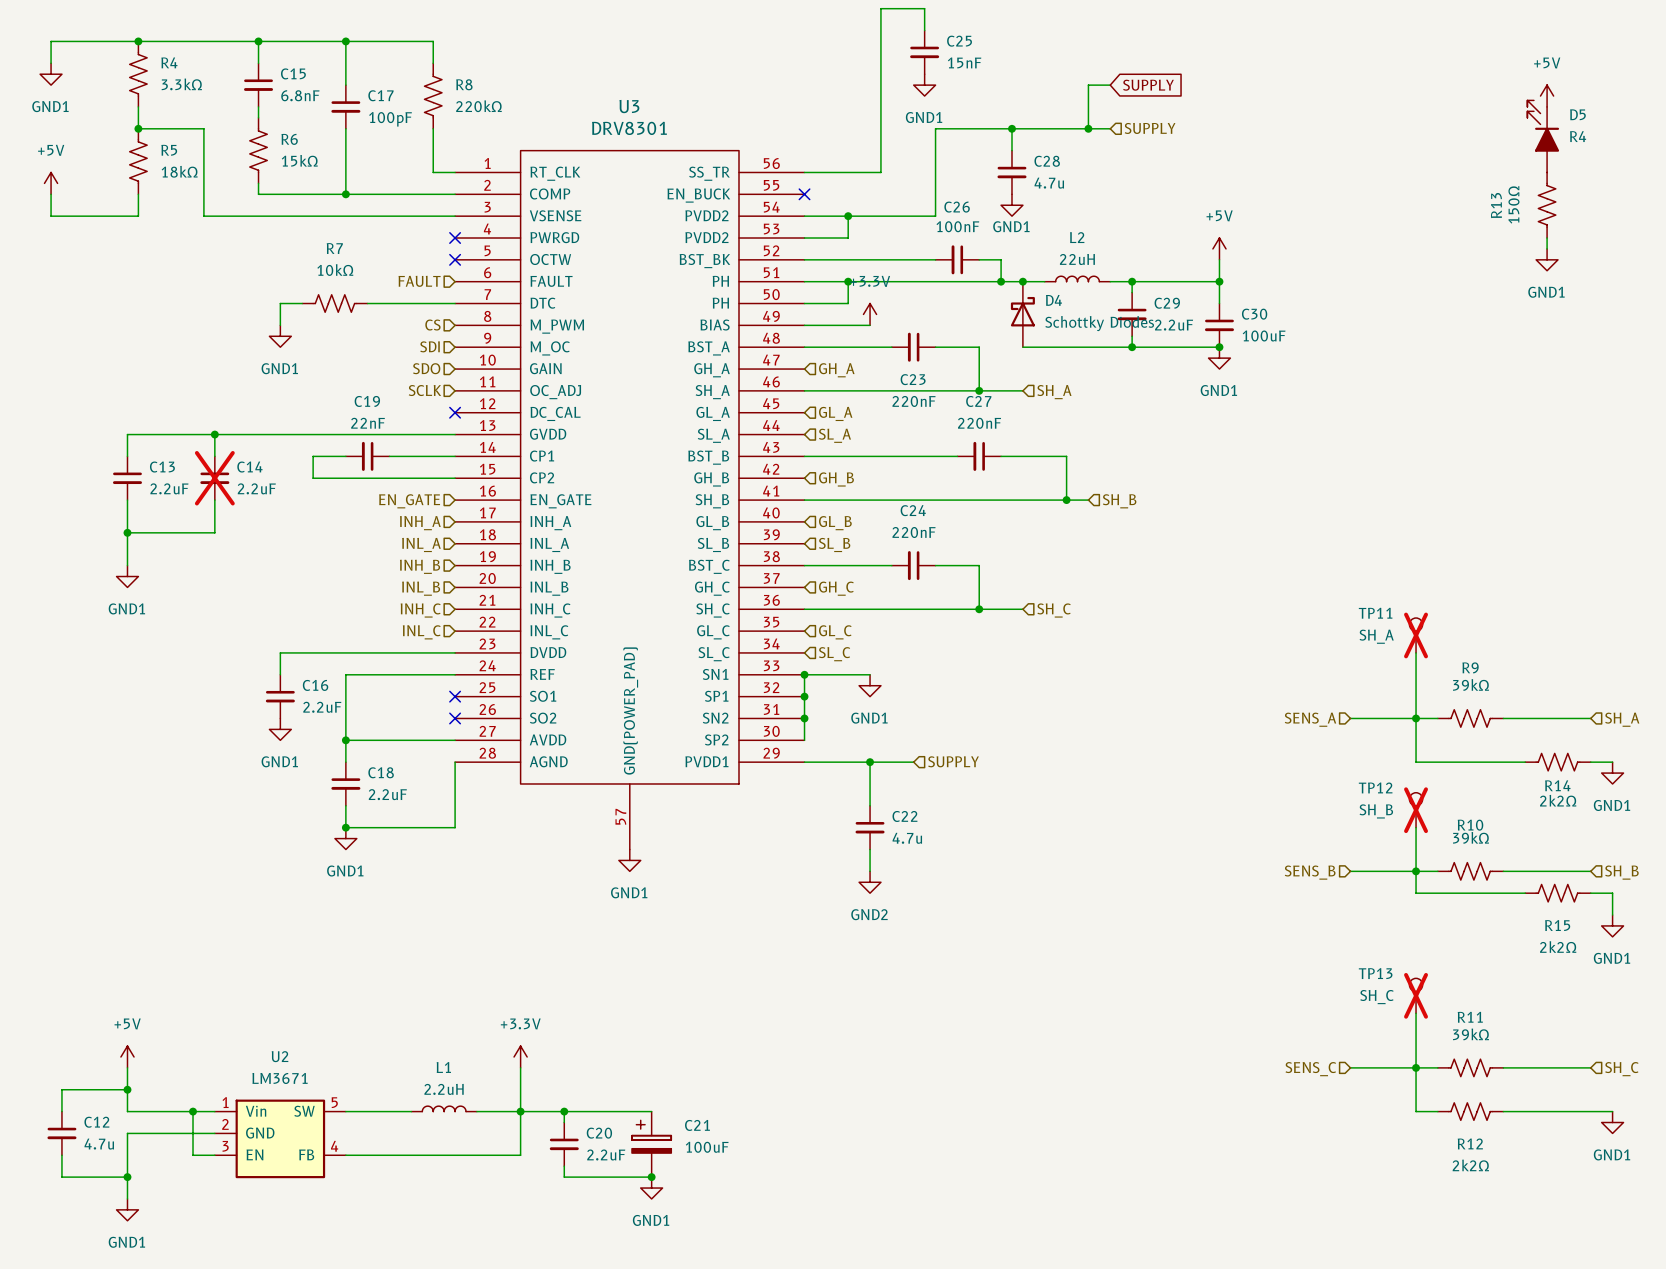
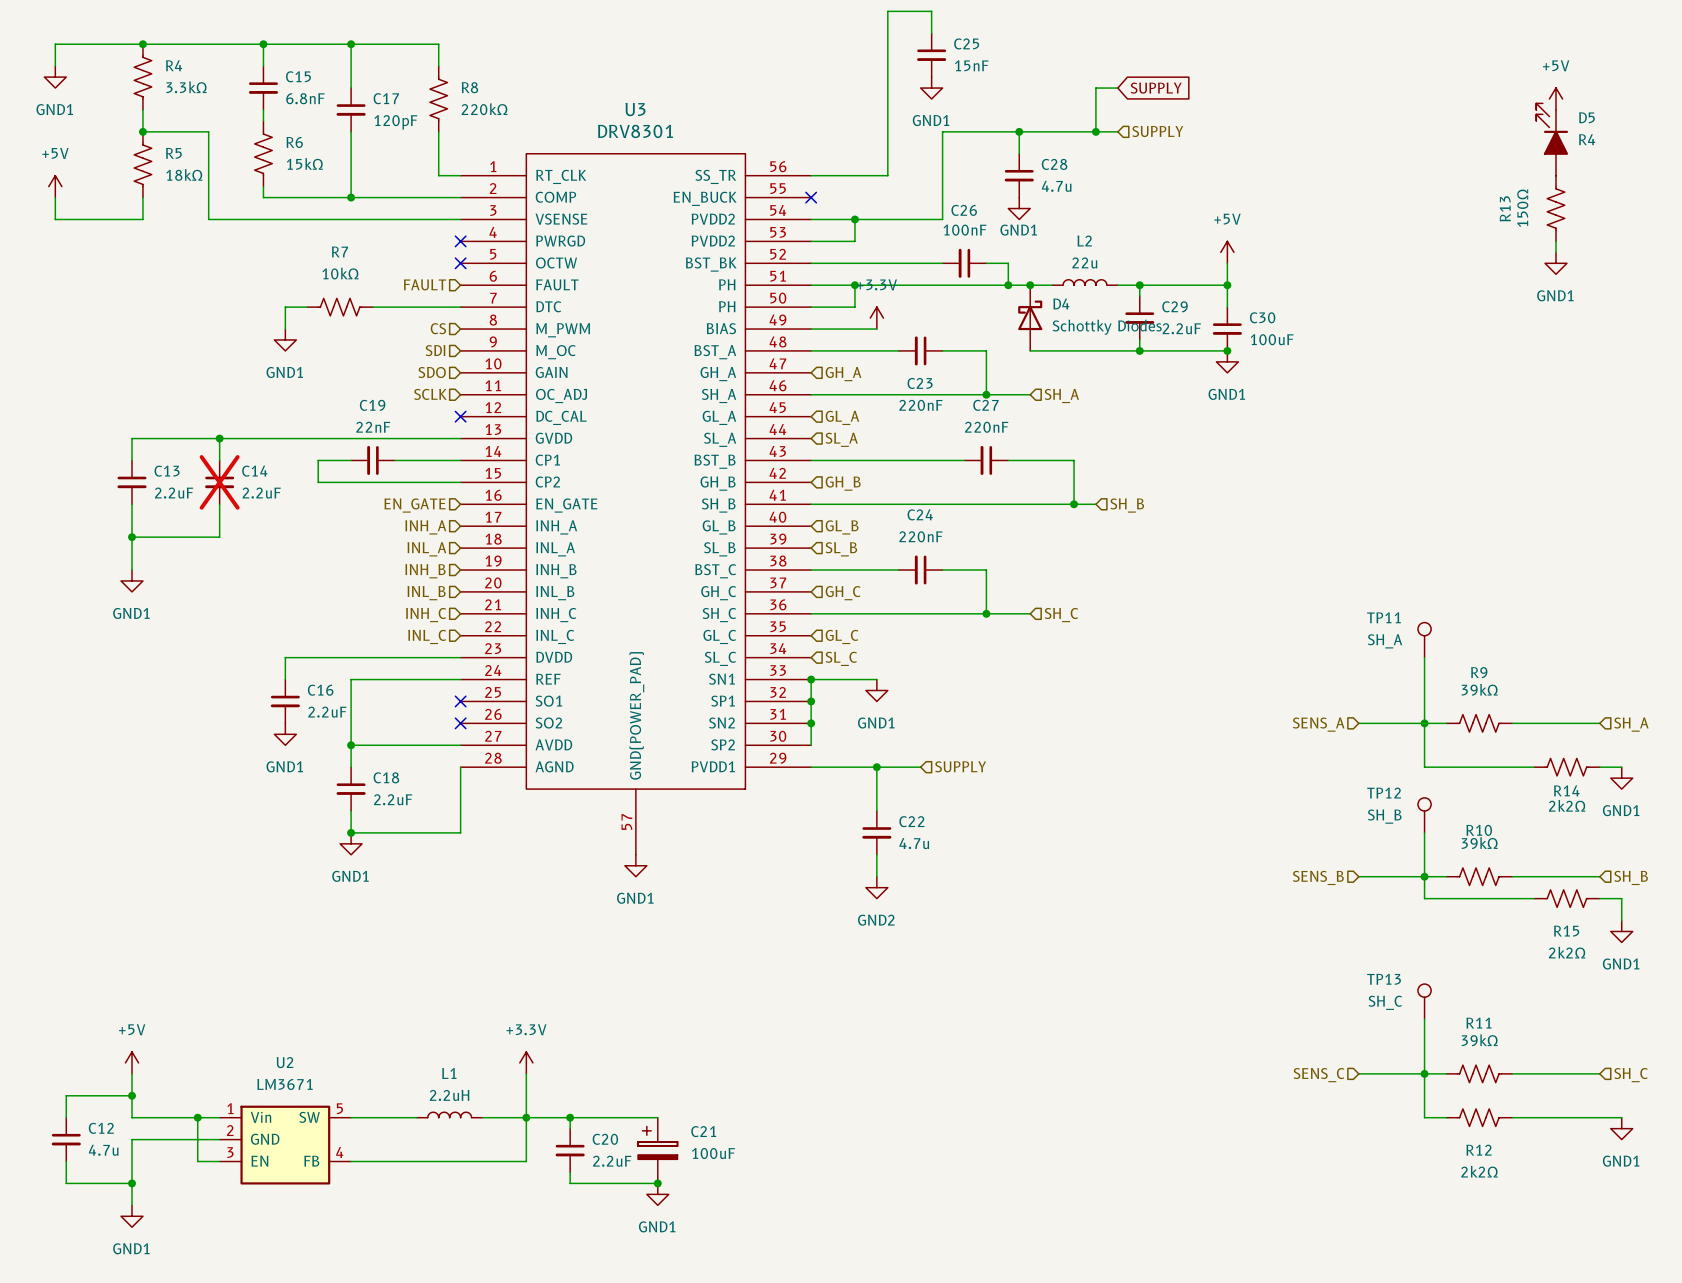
C17 value: 100pF (390, 119) -> 120pF (395, 122)
L2 value: 22uH (1077, 259) -> 22u (1084, 262)
TP11 do-not-place cross: (1416, 635) -> none
TP12 do-not-place cross: (1416, 810) -> none
TP13 do-not-place cross: (1416, 995) -> none

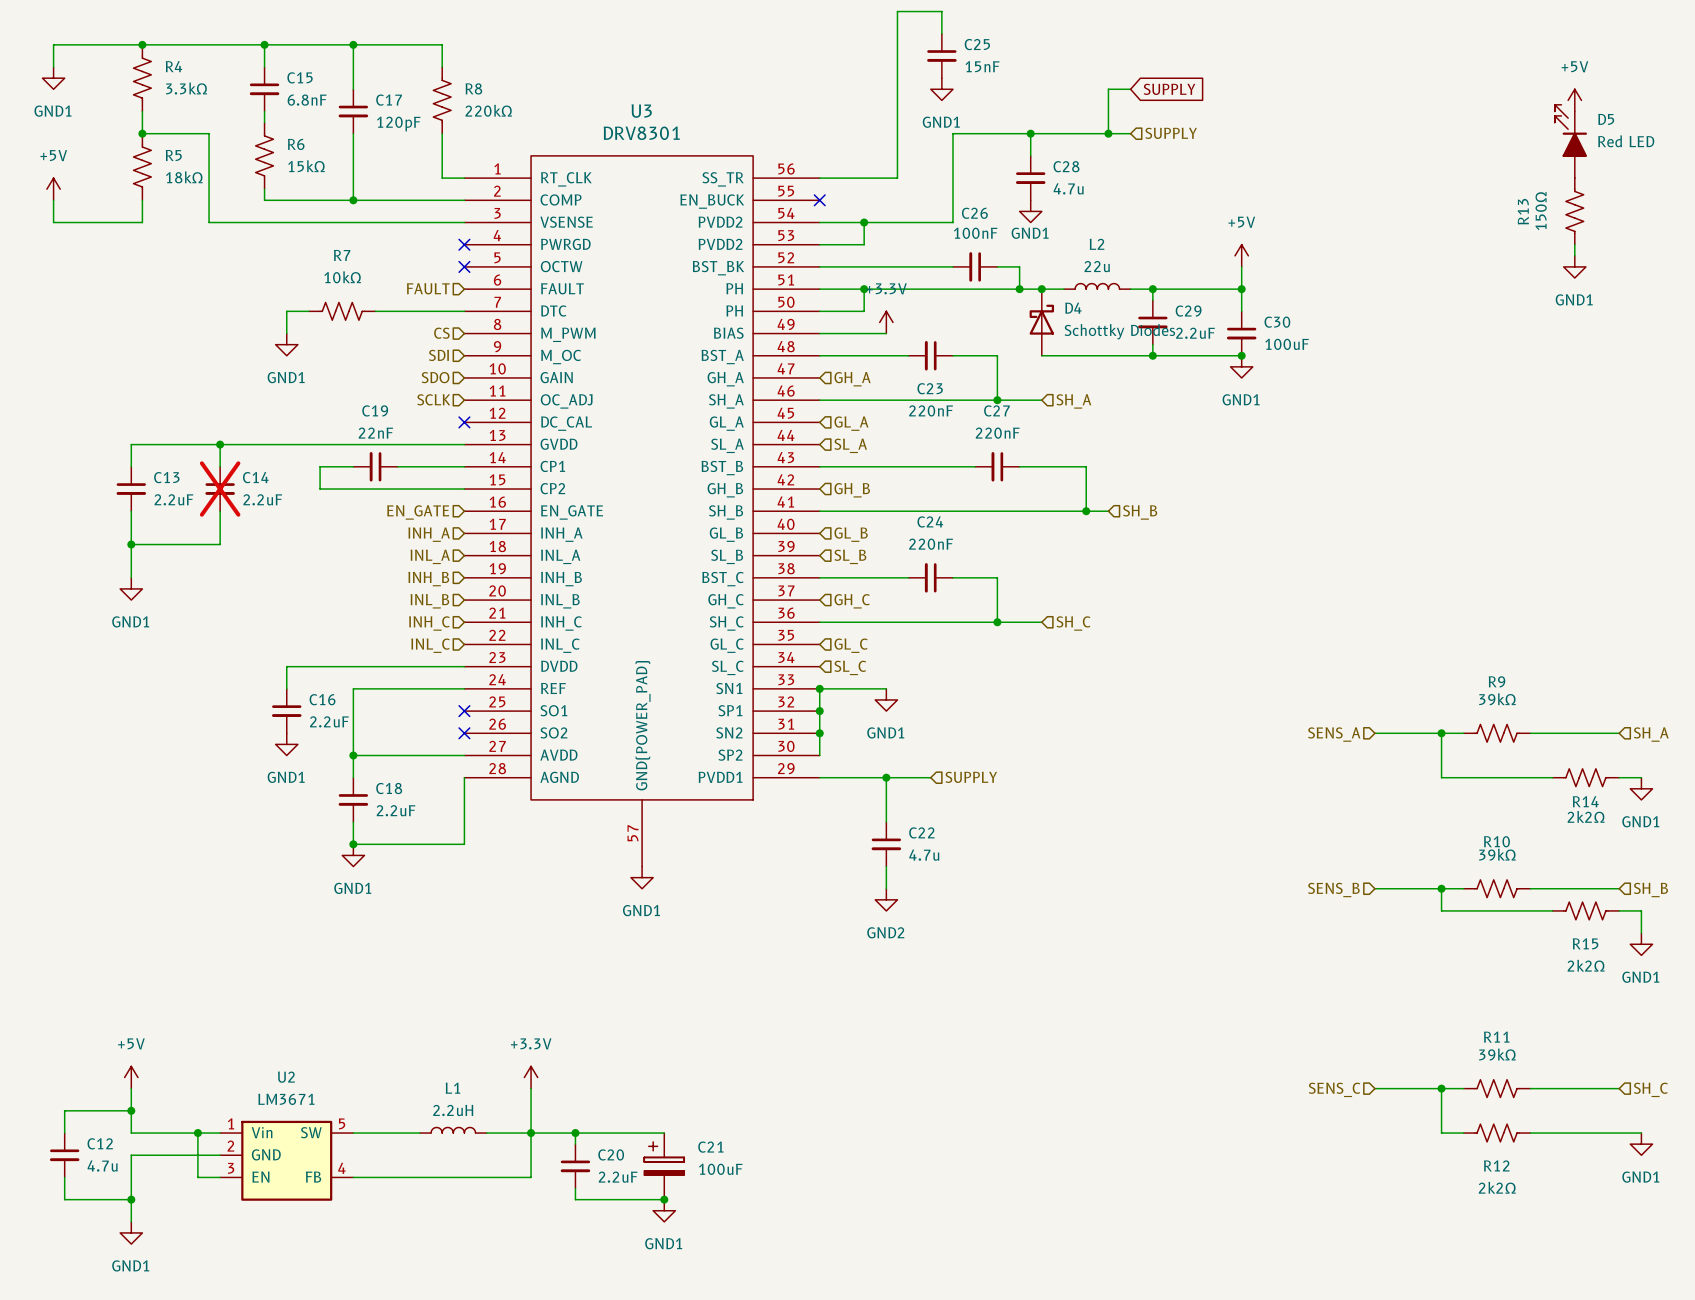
D5 value: R4 (1587, 139) -> Red LED (1626, 141)
TP11: SH_A (1424, 640) -> none
wire: (1424, 657) (1424, 723) -> none
TP12: SH_B (1424, 815) -> none
wire: (1424, 832) (1424, 876) -> none
TP13: SH_C (1424, 1001) -> none
wire: (1424, 1019) (1424, 1073) -> none

